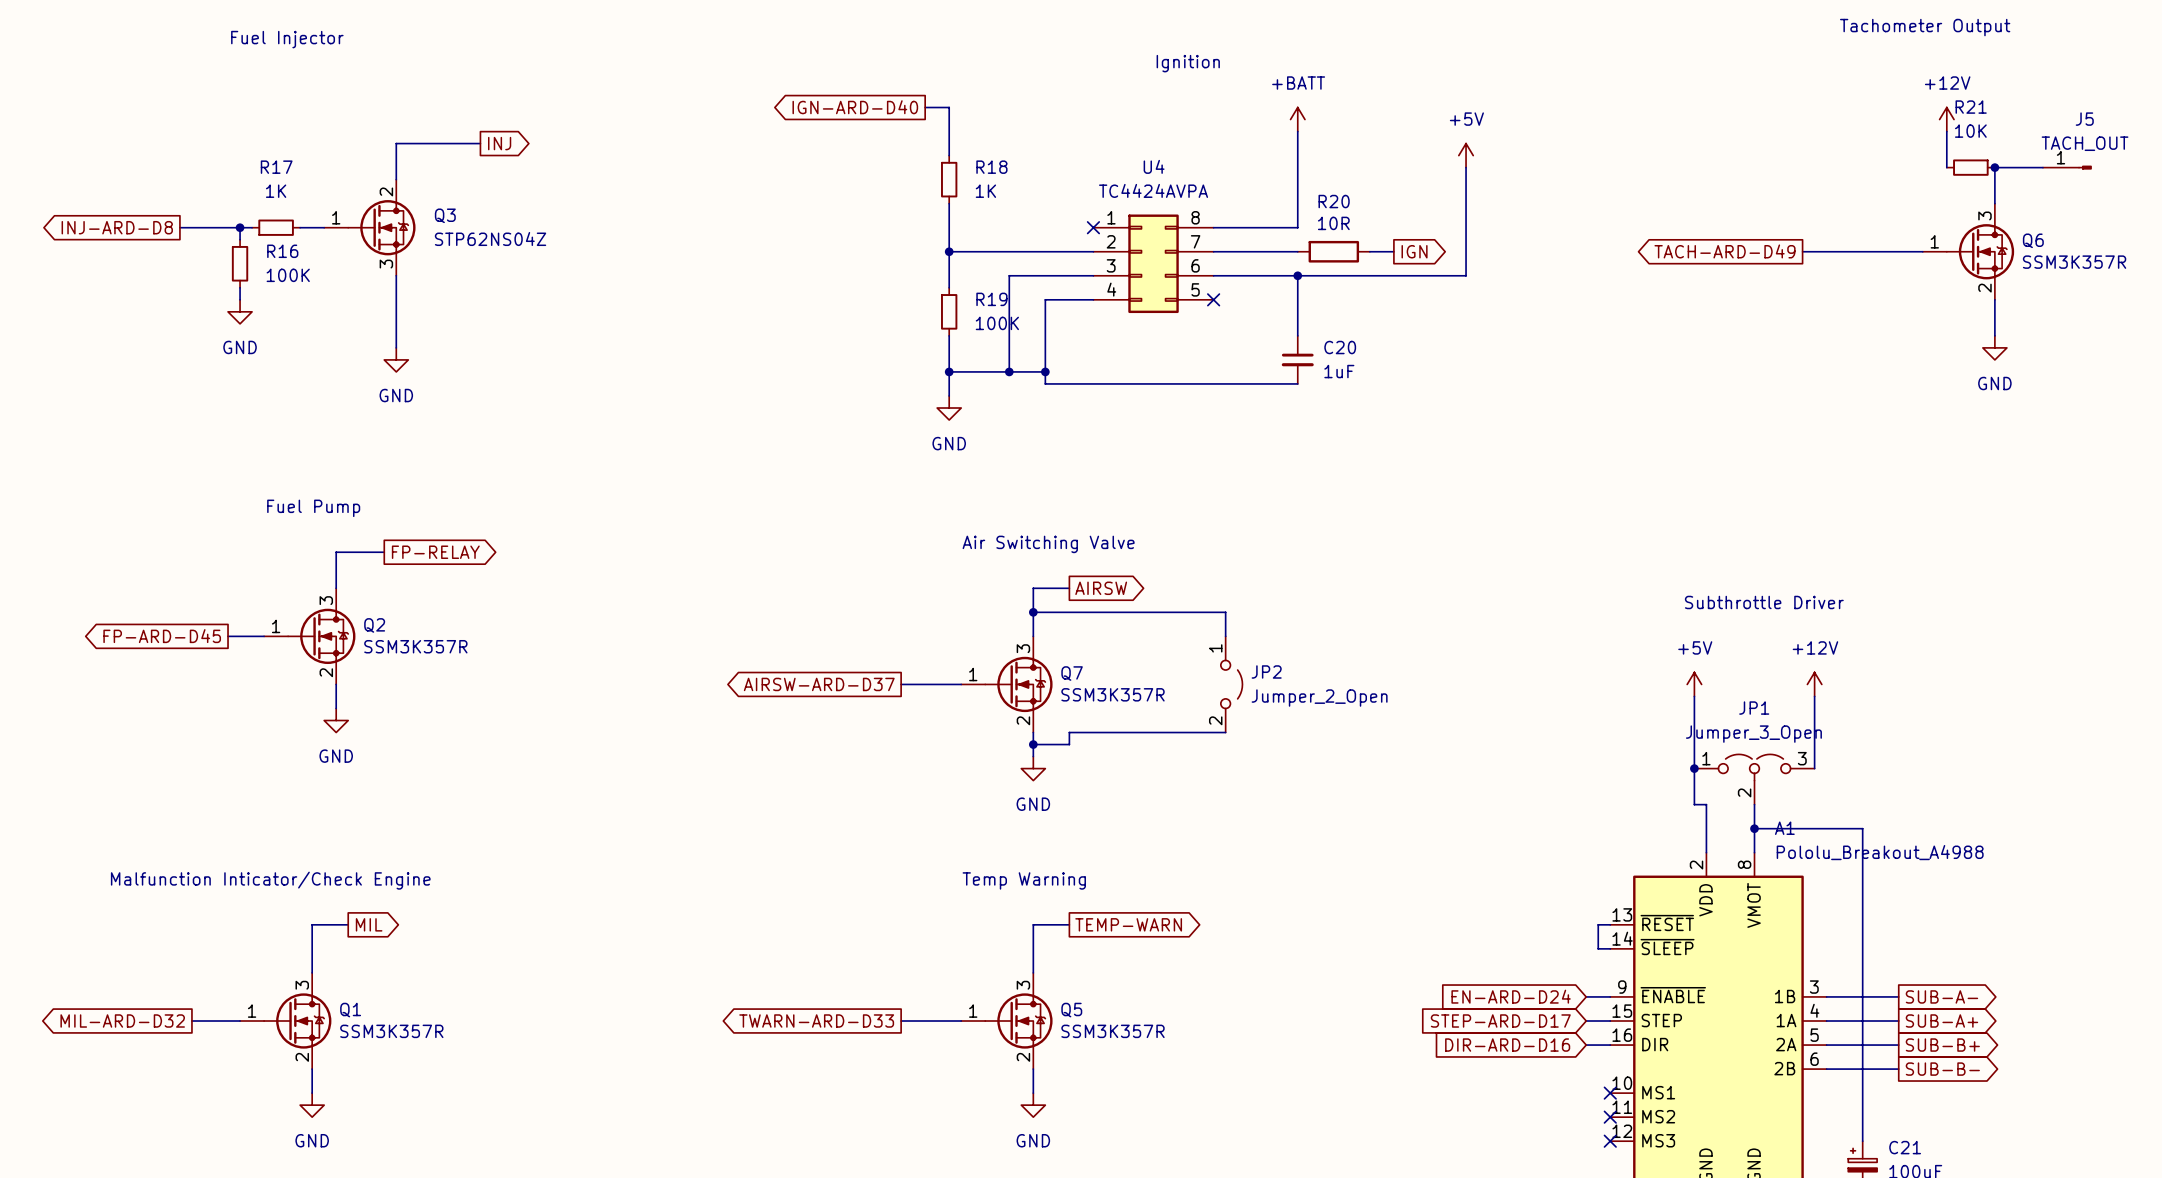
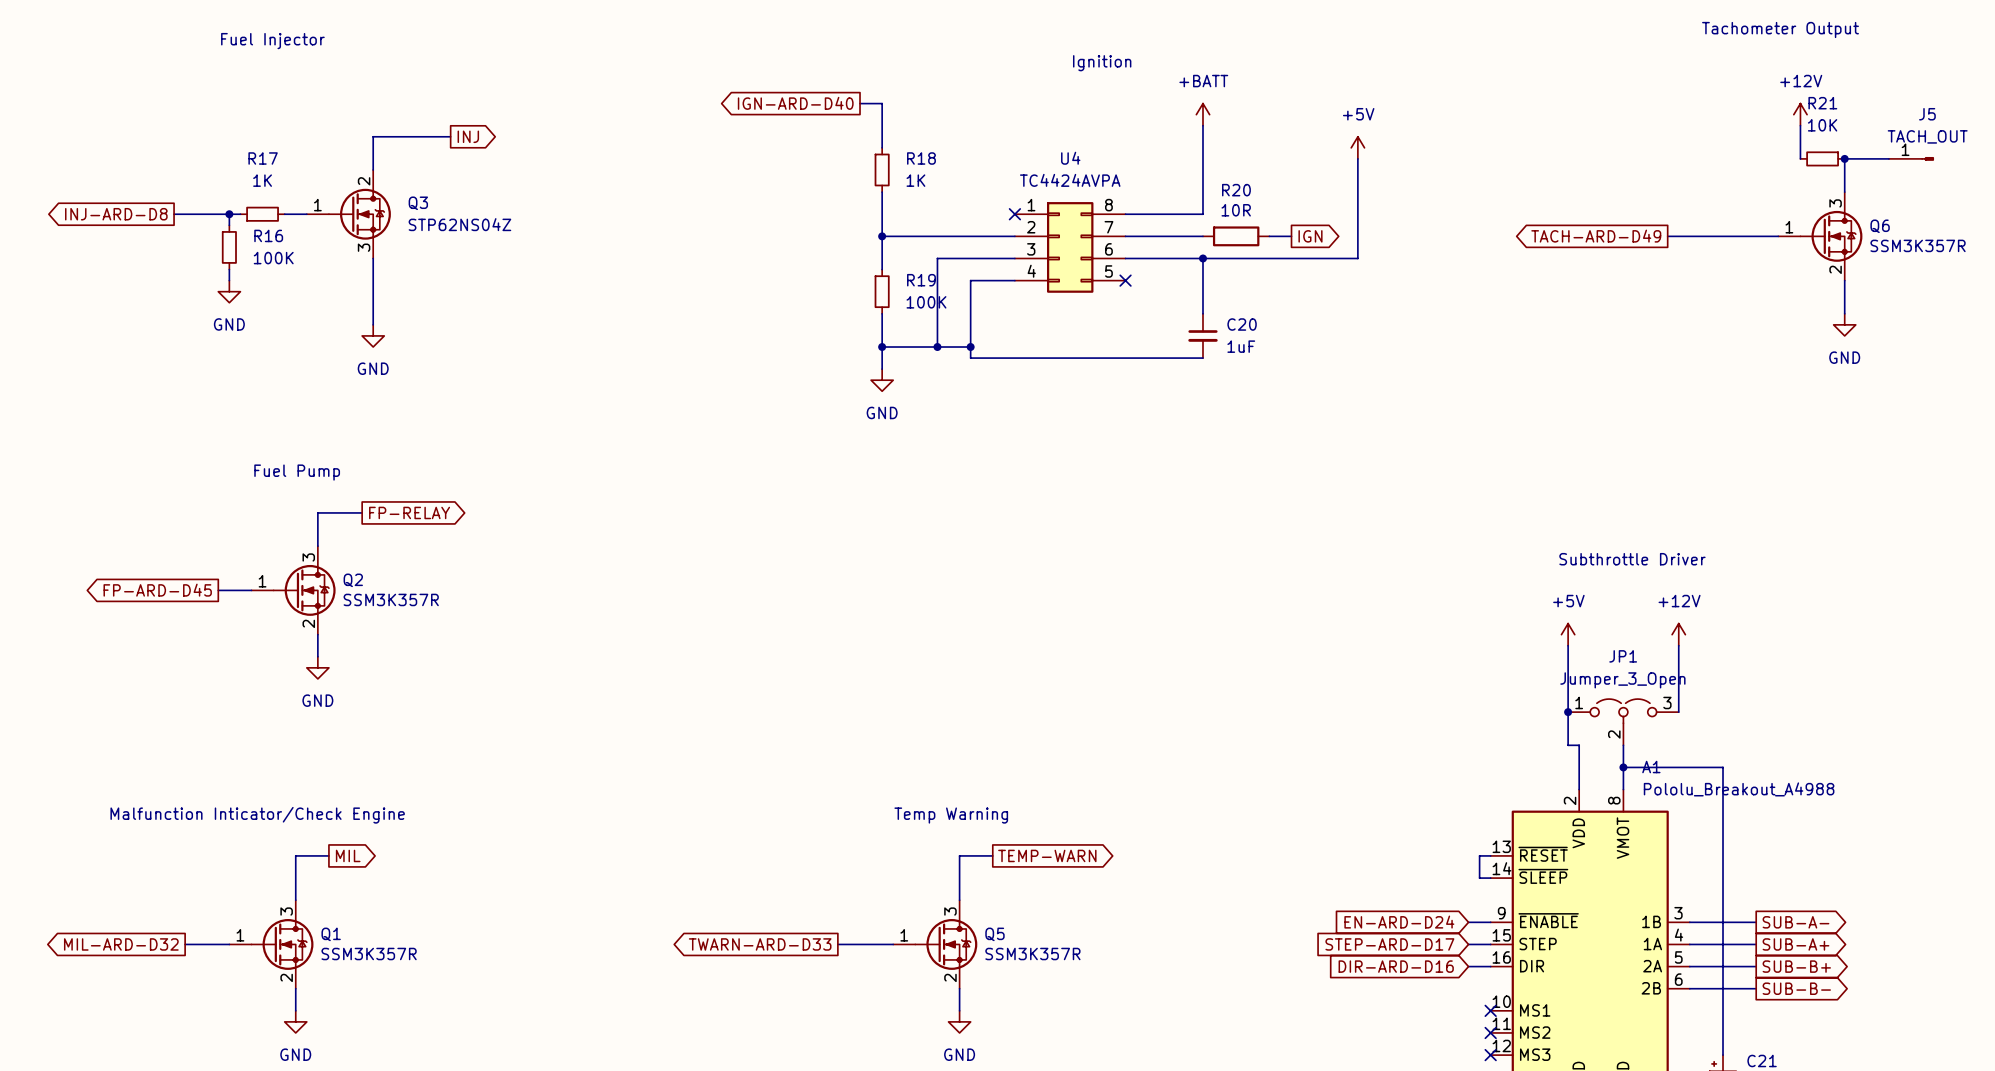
text: Air Switching Valve (1048, 544) -> none
wire: (1069, 588) (1033, 588) (1033, 636) -> none
global label: AIRSW (1101, 588) -> none
wire: (1033, 612) (1225, 612) (1225, 636) -> none
junction: (1033, 612) -> none
global label: AIRSW-ARD-D37 (819, 684) -> none
wire: (901, 684) (961, 684) -> none
Q7: SSM3K357R (1006, 684) -> none
JP2: Jumper_2_Open (1231, 684) -> none
wire: (1033, 732) (1033, 756) -> none
wire: (1225, 732) (1069, 732) (1069, 744) (1033, 744) -> none
junction: (1033, 744) -> none
power symbol: GND (1033, 768) -> none

